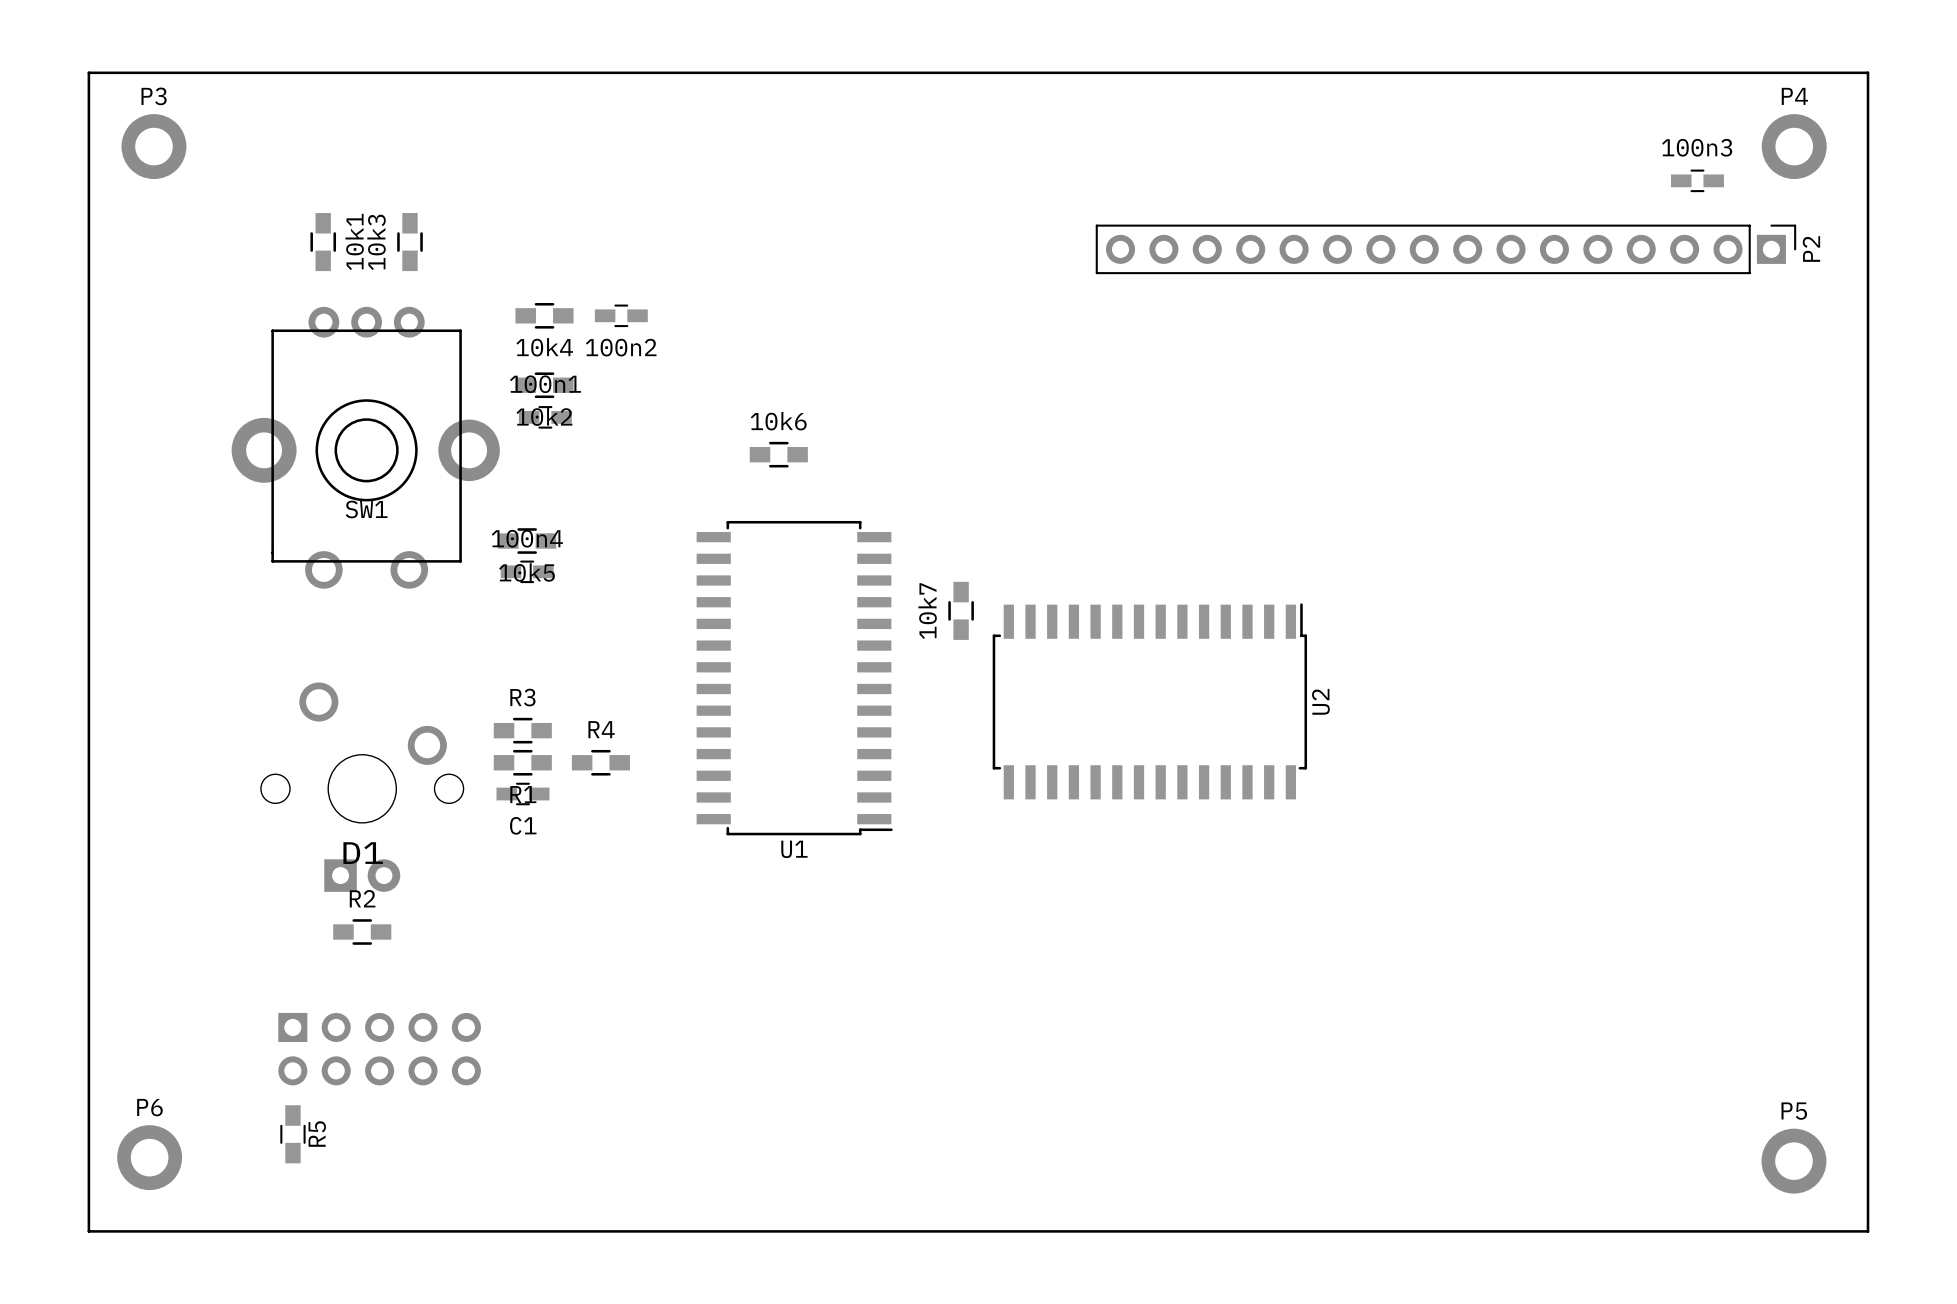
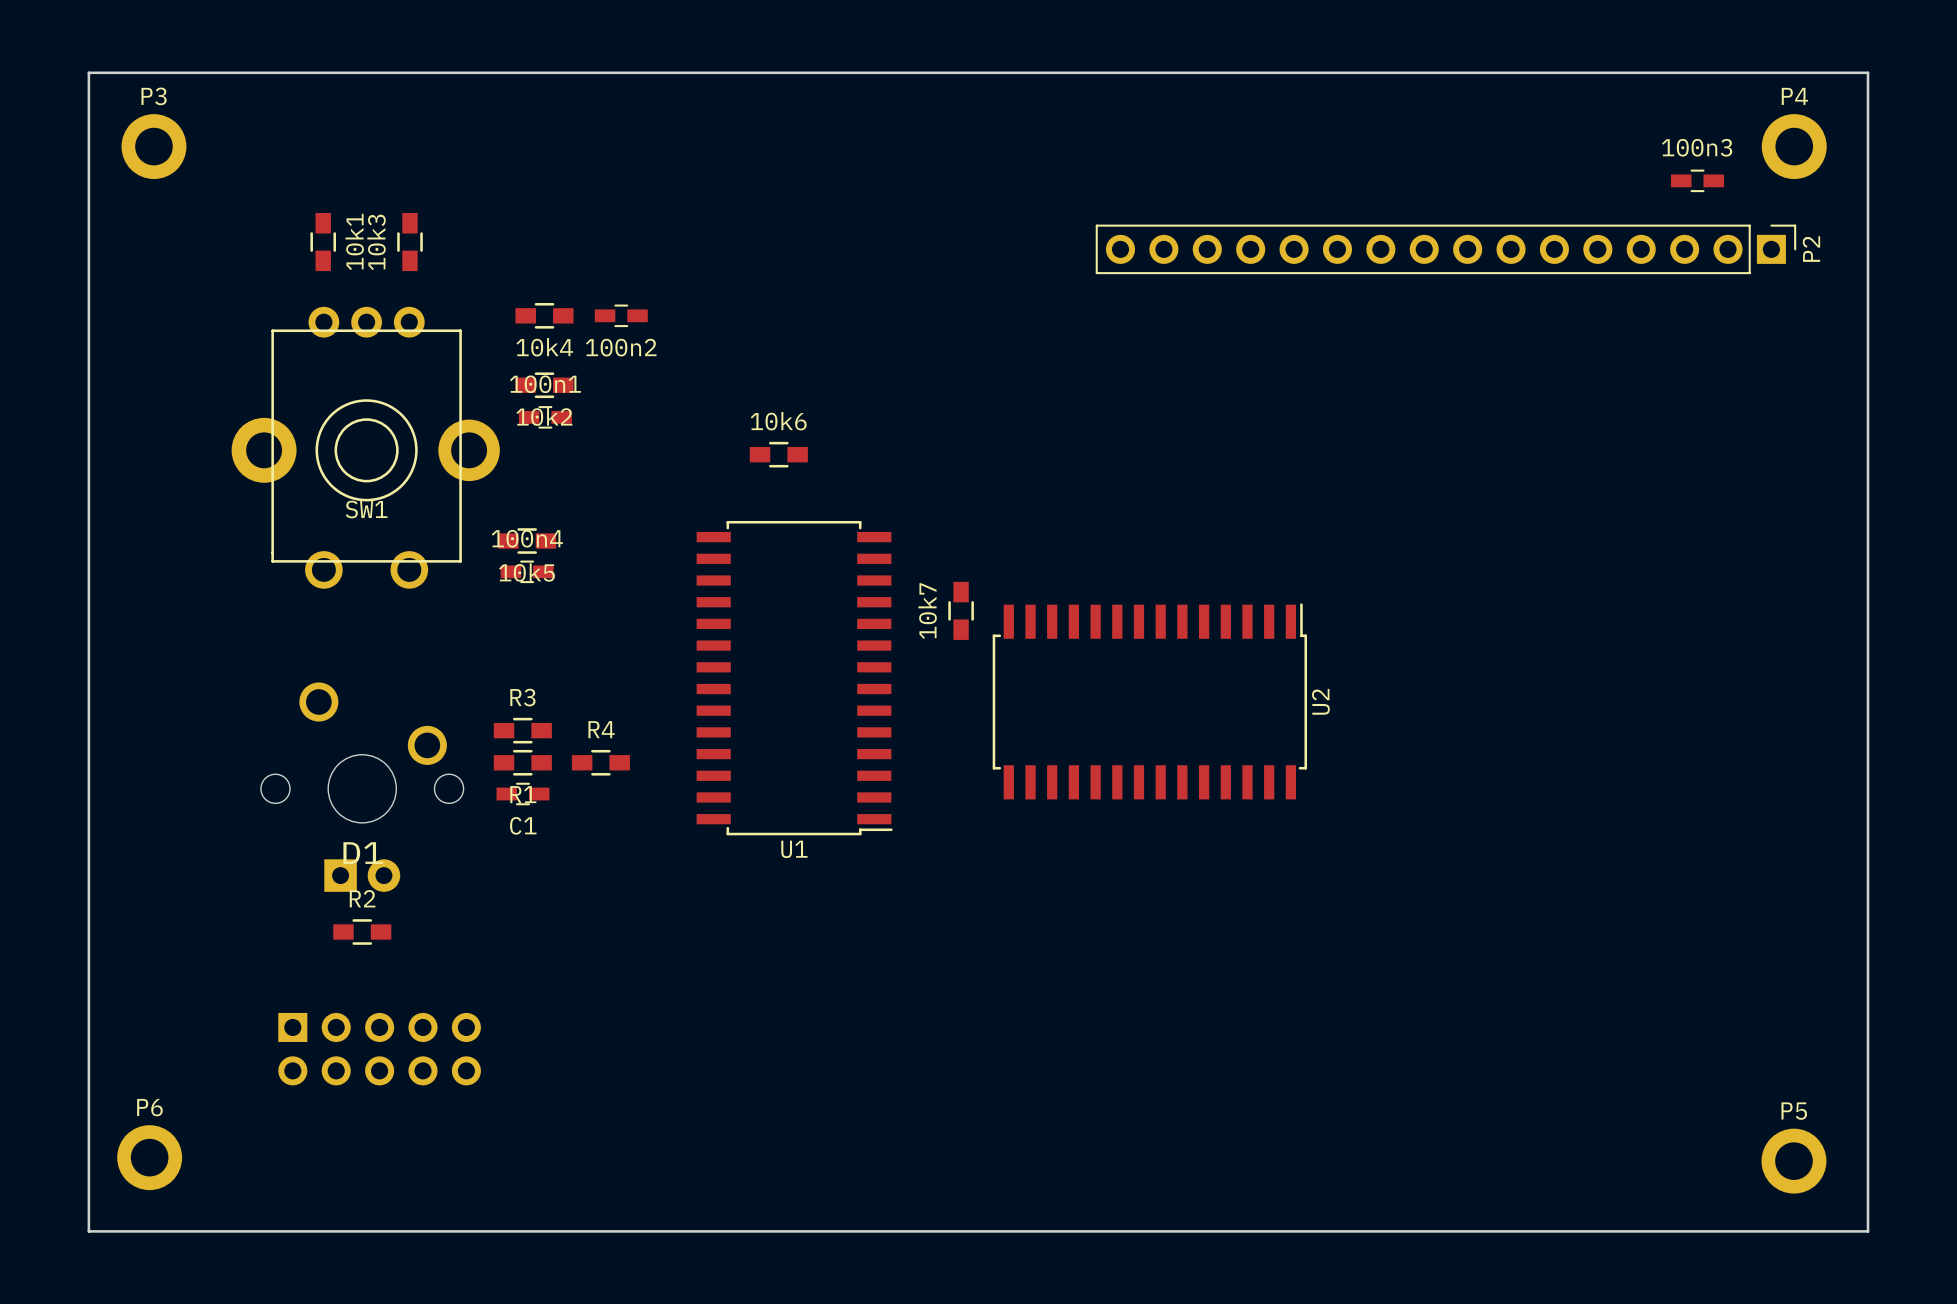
R5: (292, 1134) -> none

